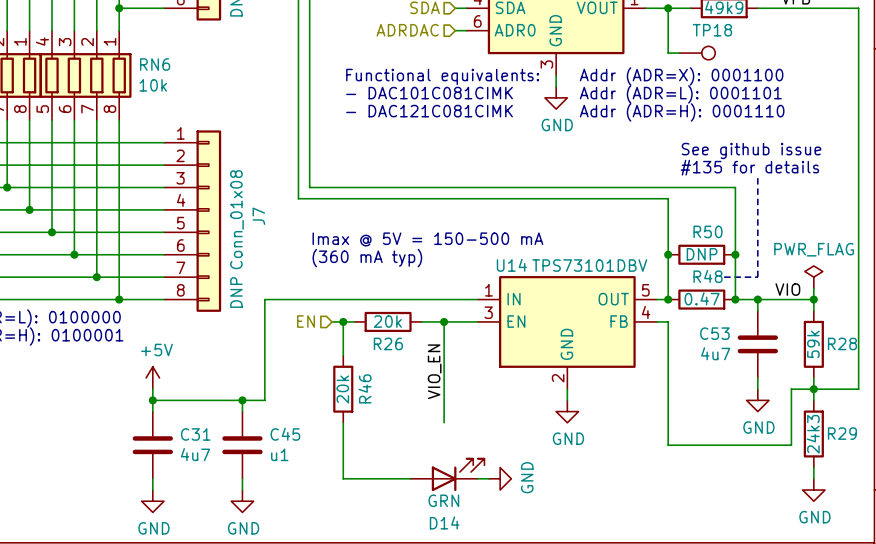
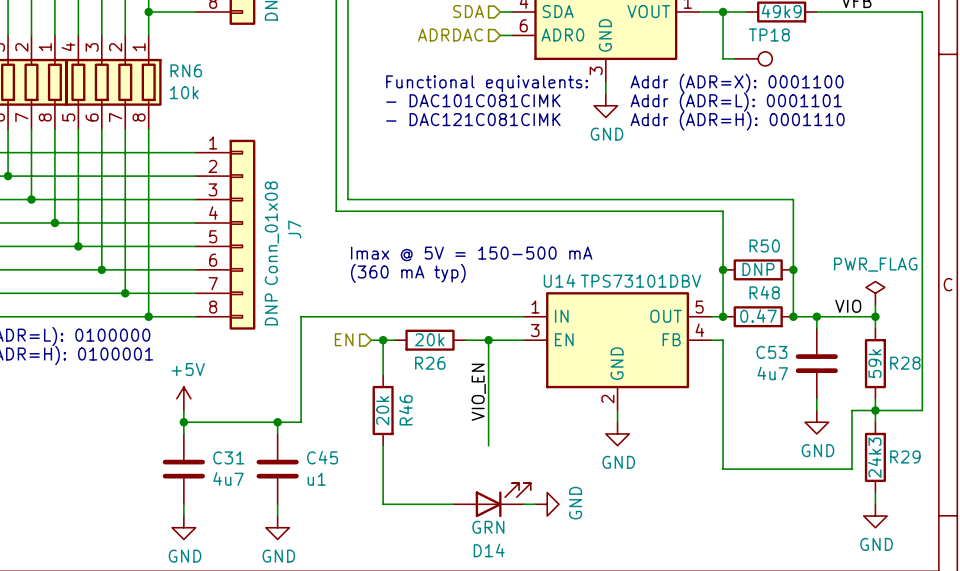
text: See github issue (751, 150) -> none
text: #135 for details (749, 167) -> none
line: (757, 176) (757, 277) (724, 277) -> none

